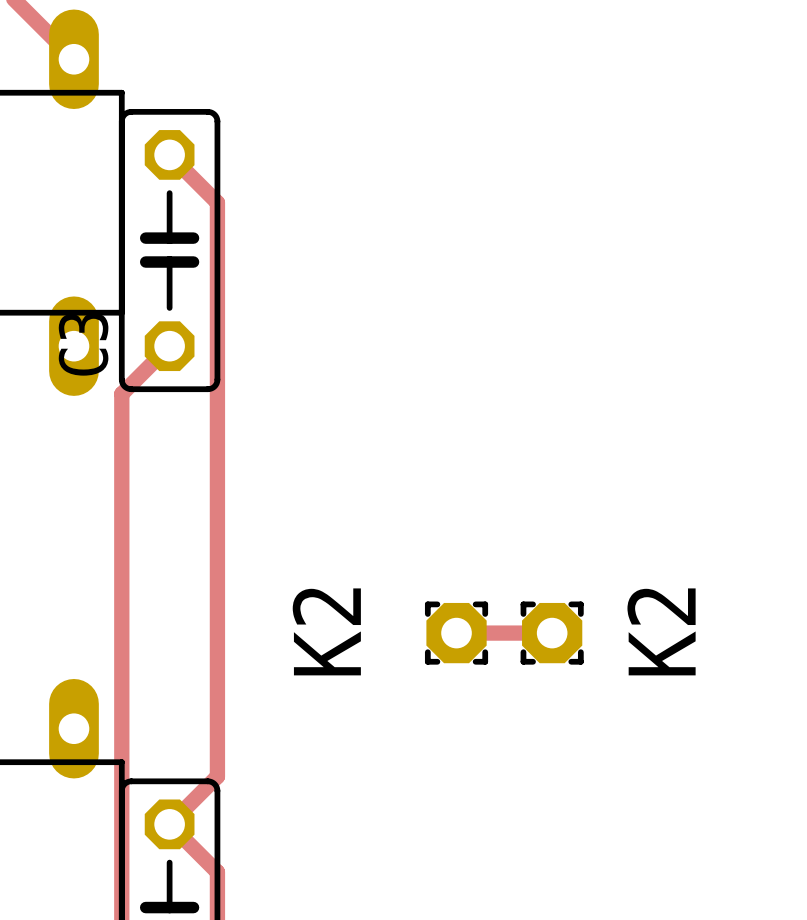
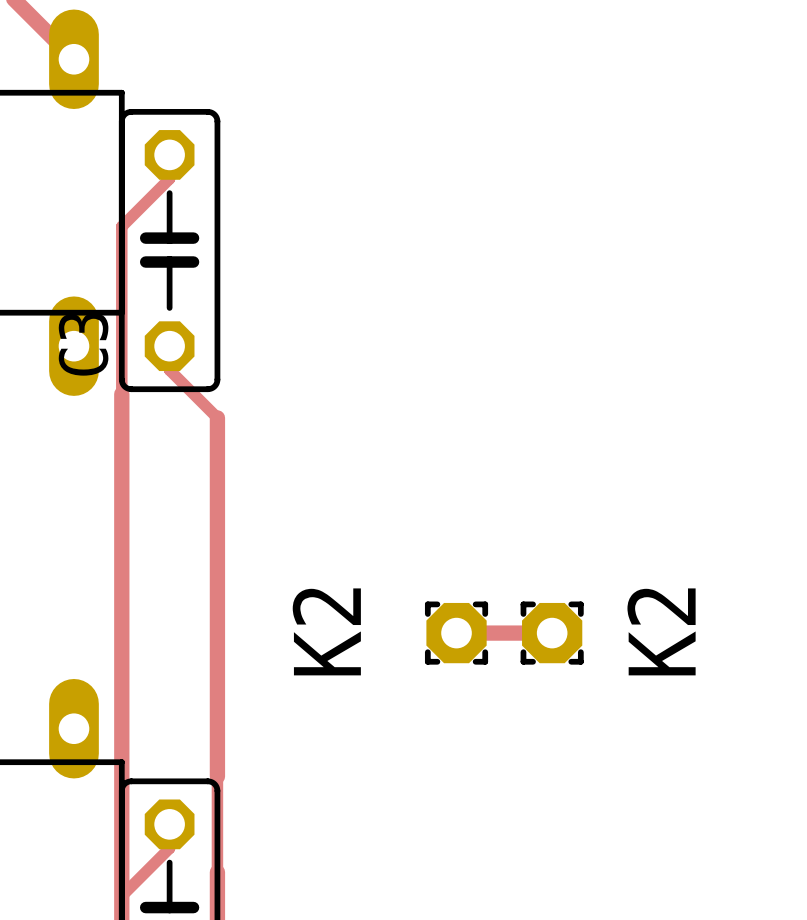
track: (169, 154) (217, 202) (217, 417) -> (169, 154) (169, 178) (121, 226) (121, 393)
track: (169, 346) (121, 393) -> (169, 346) (169, 370) (217, 417)
track: (217, 776) (169, 824) (217, 872) -> (217, 776) (217, 872)
track: none -> (169, 824) (169, 848) (121, 896)

